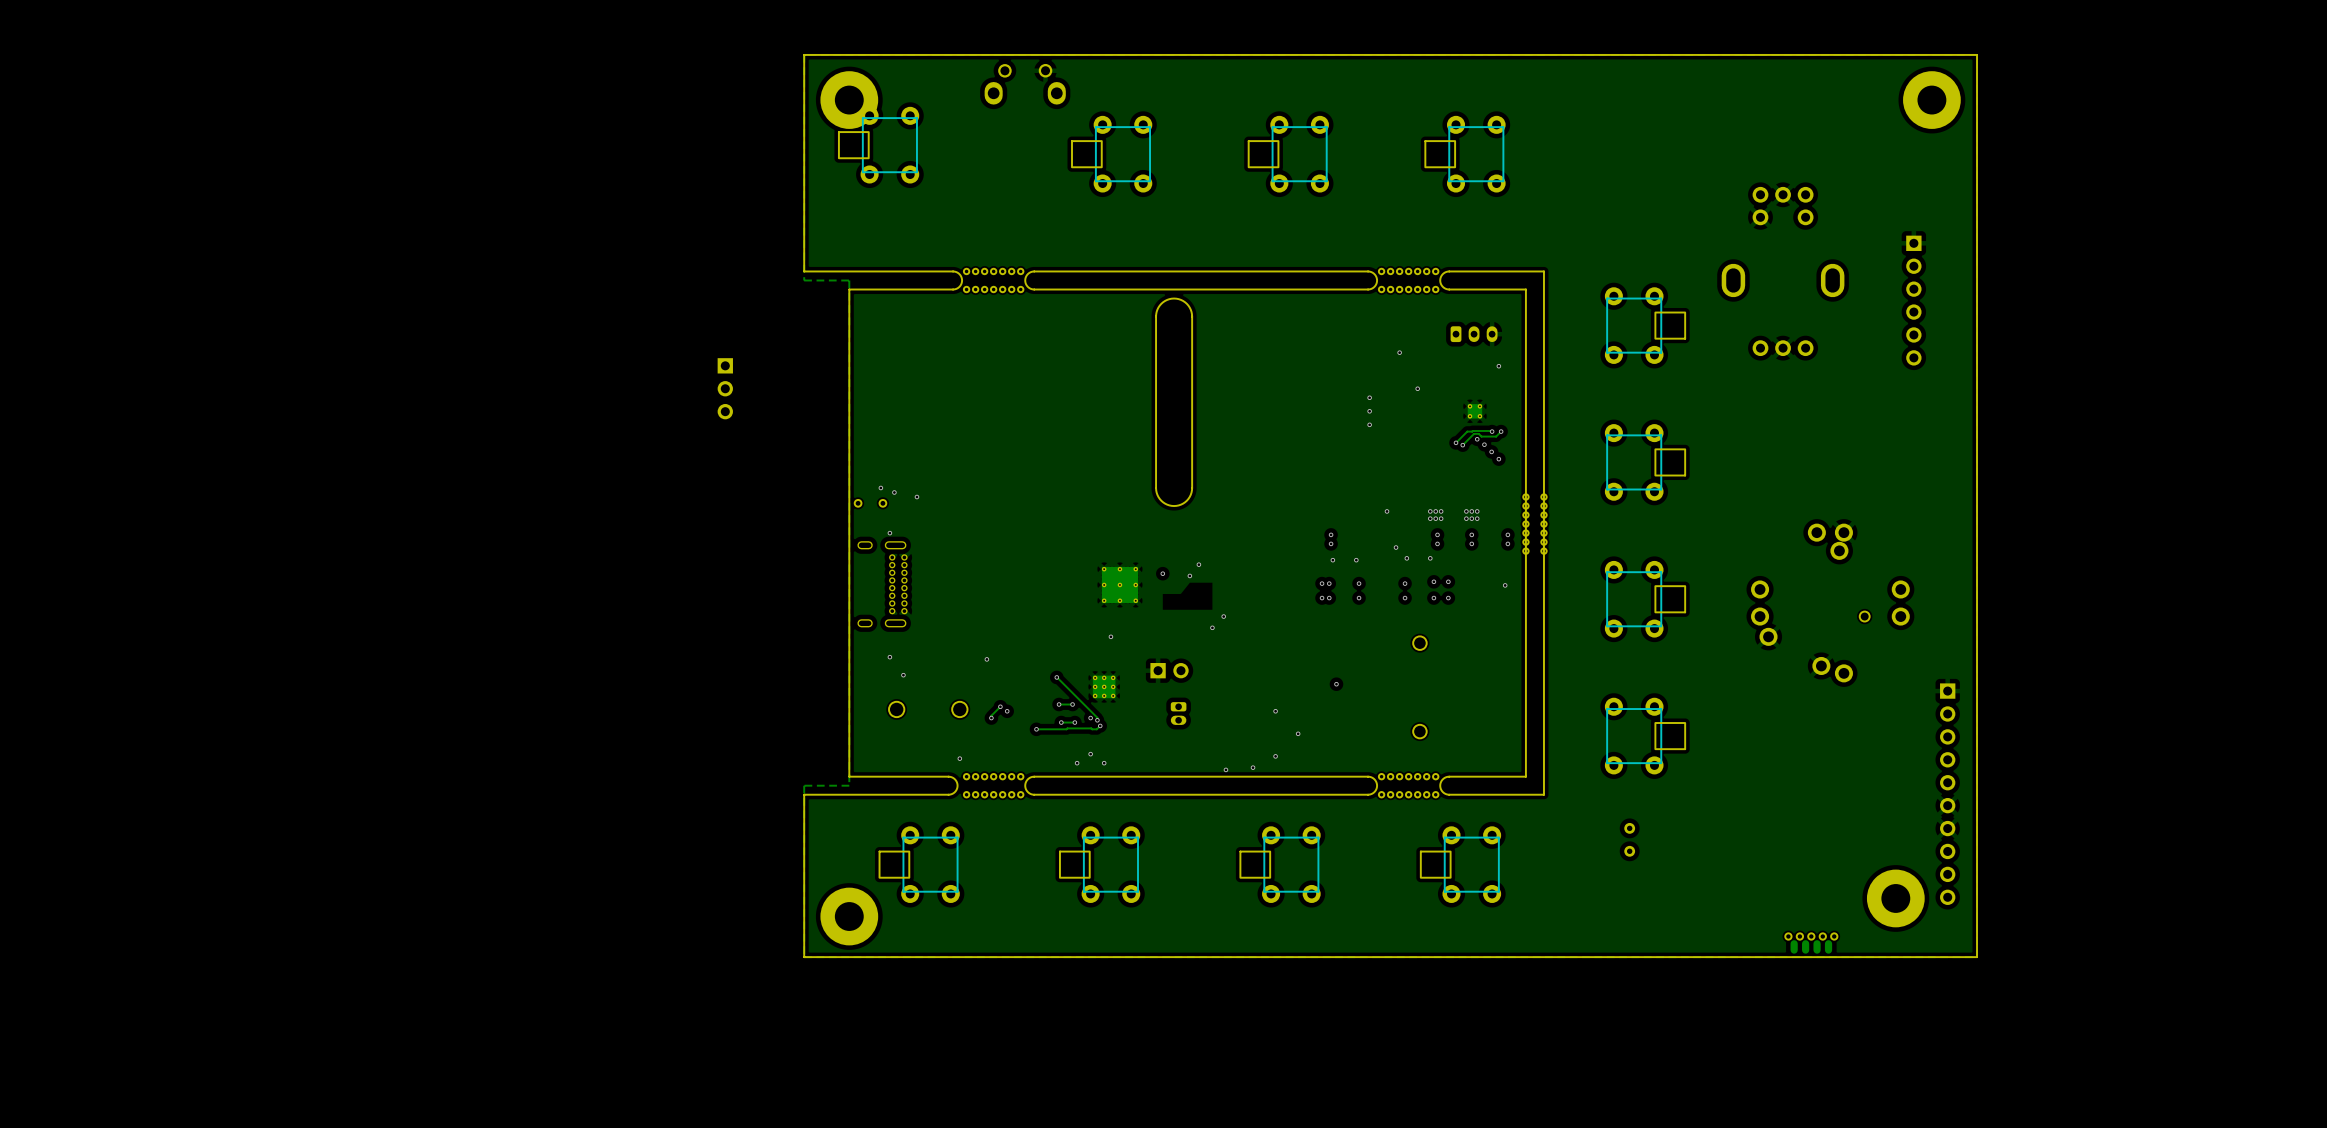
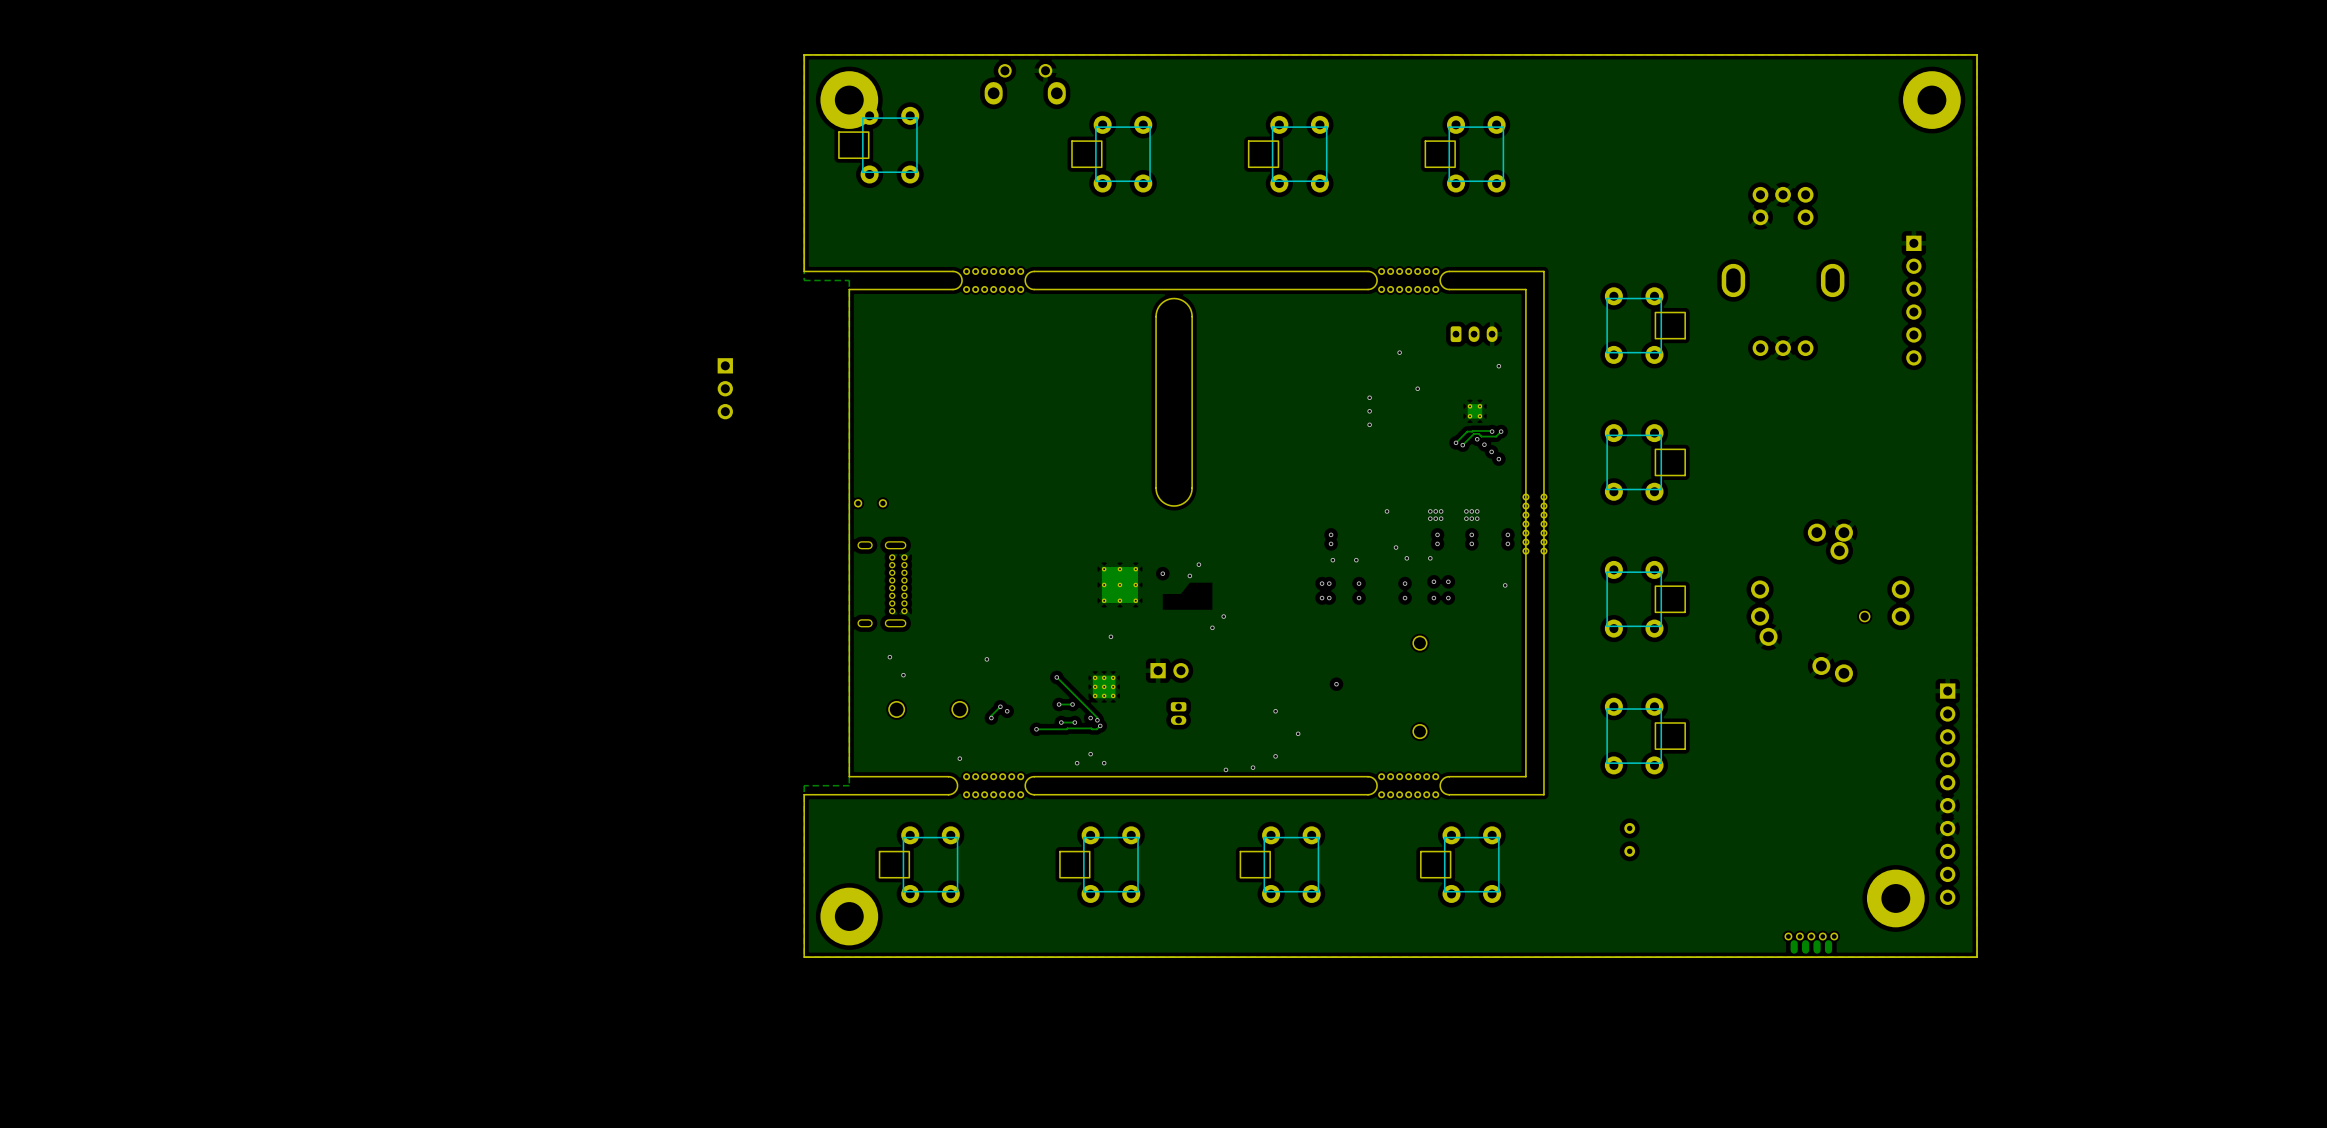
via: (880, 487) -> none
via: (894, 492) -> none
via: (916, 497) -> none
via: (889, 533) -> none

